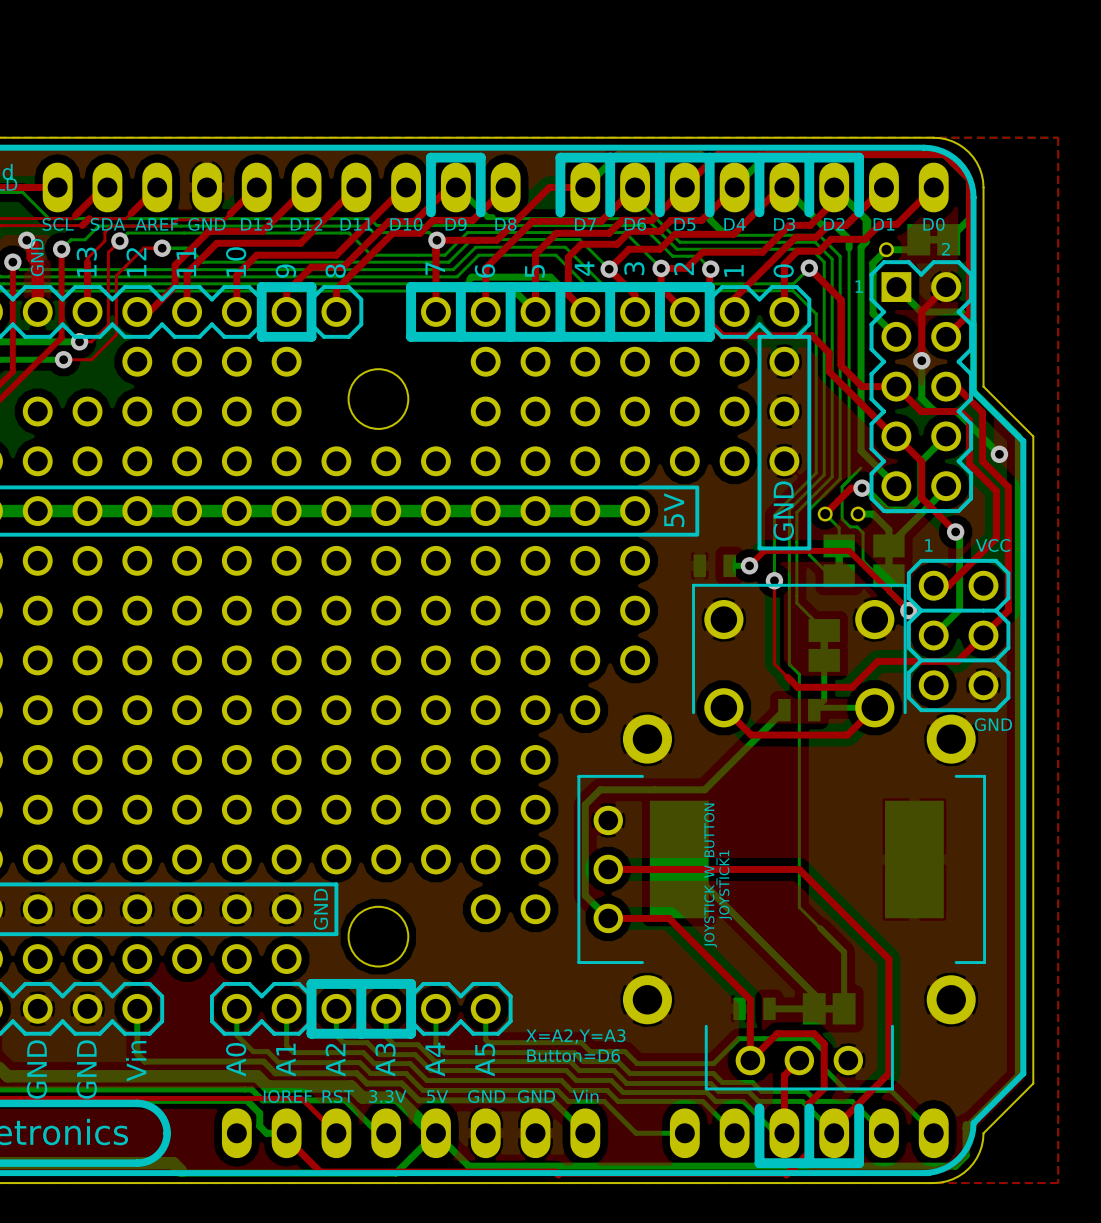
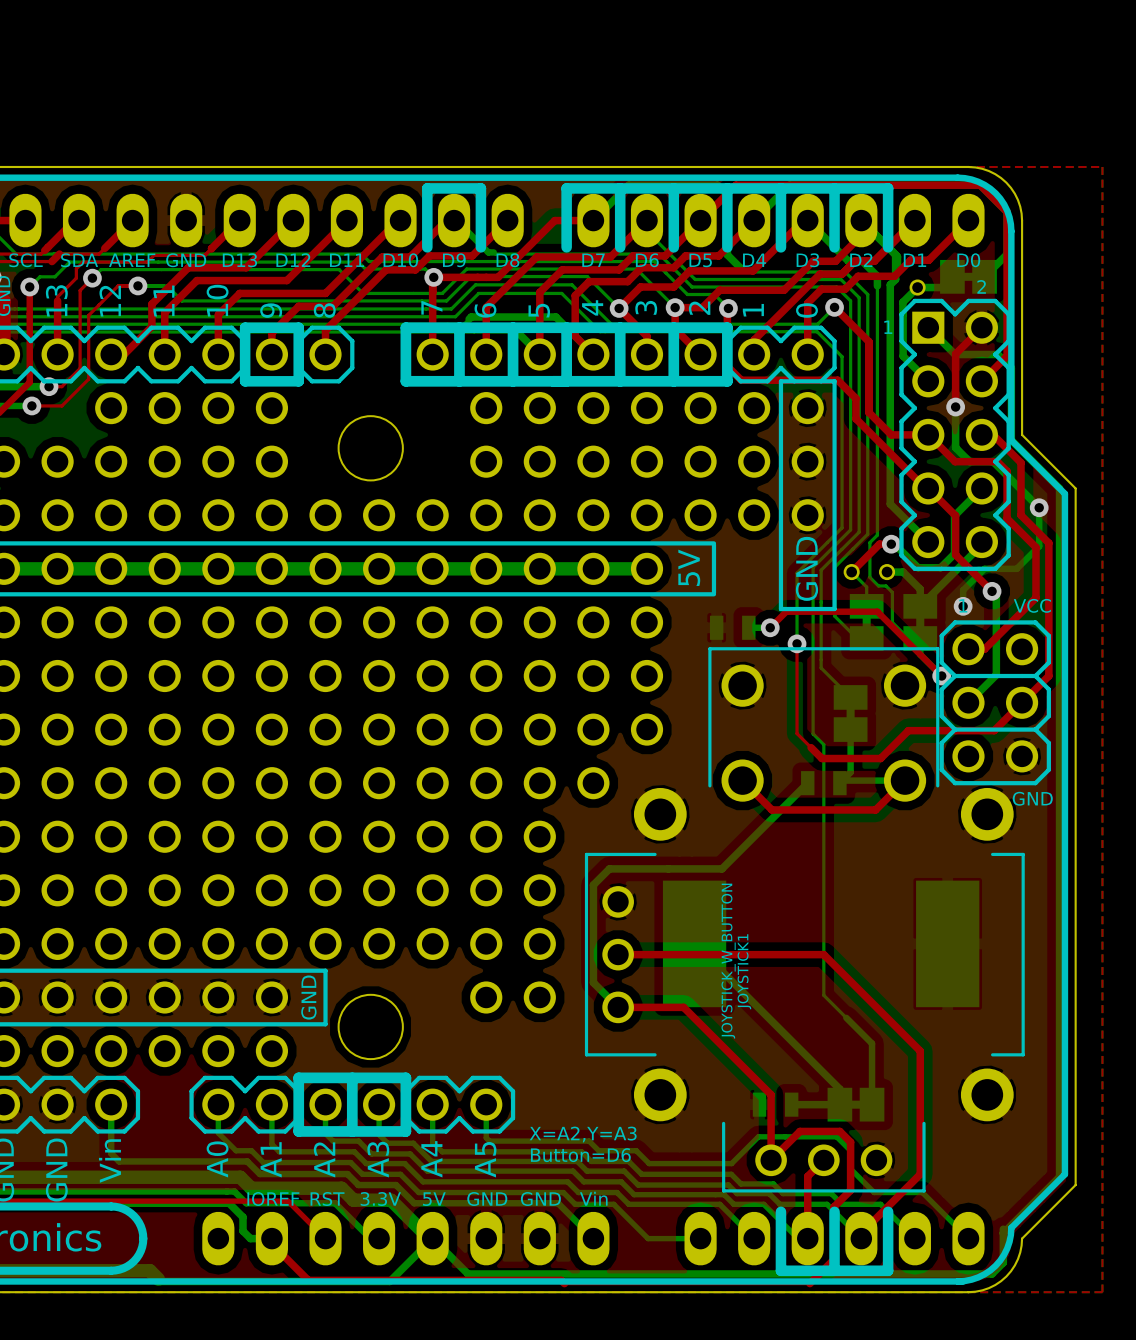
bottom track: none -> (1039, 507) (1039, 546) (1016, 568) (984, 568) (963, 590) (963, 606)
bottom track: (860, 468) (849, 479) -> none
via: none -> (963, 606)

